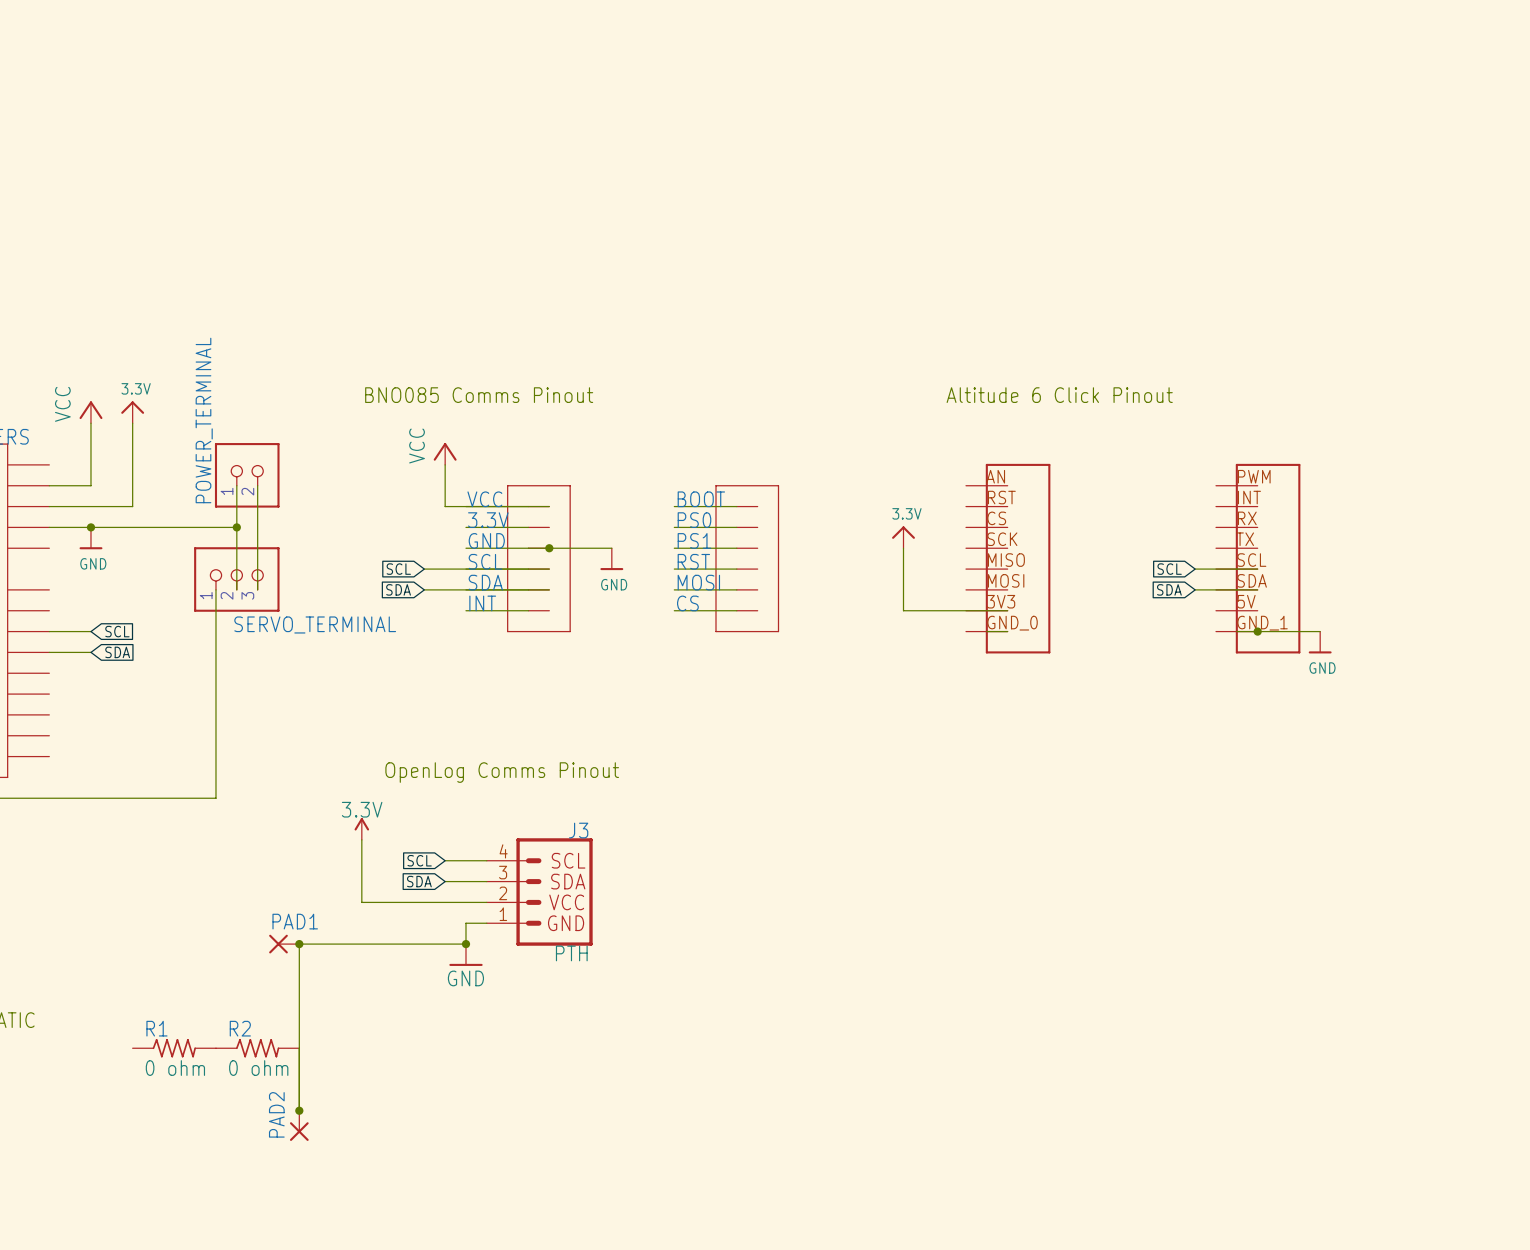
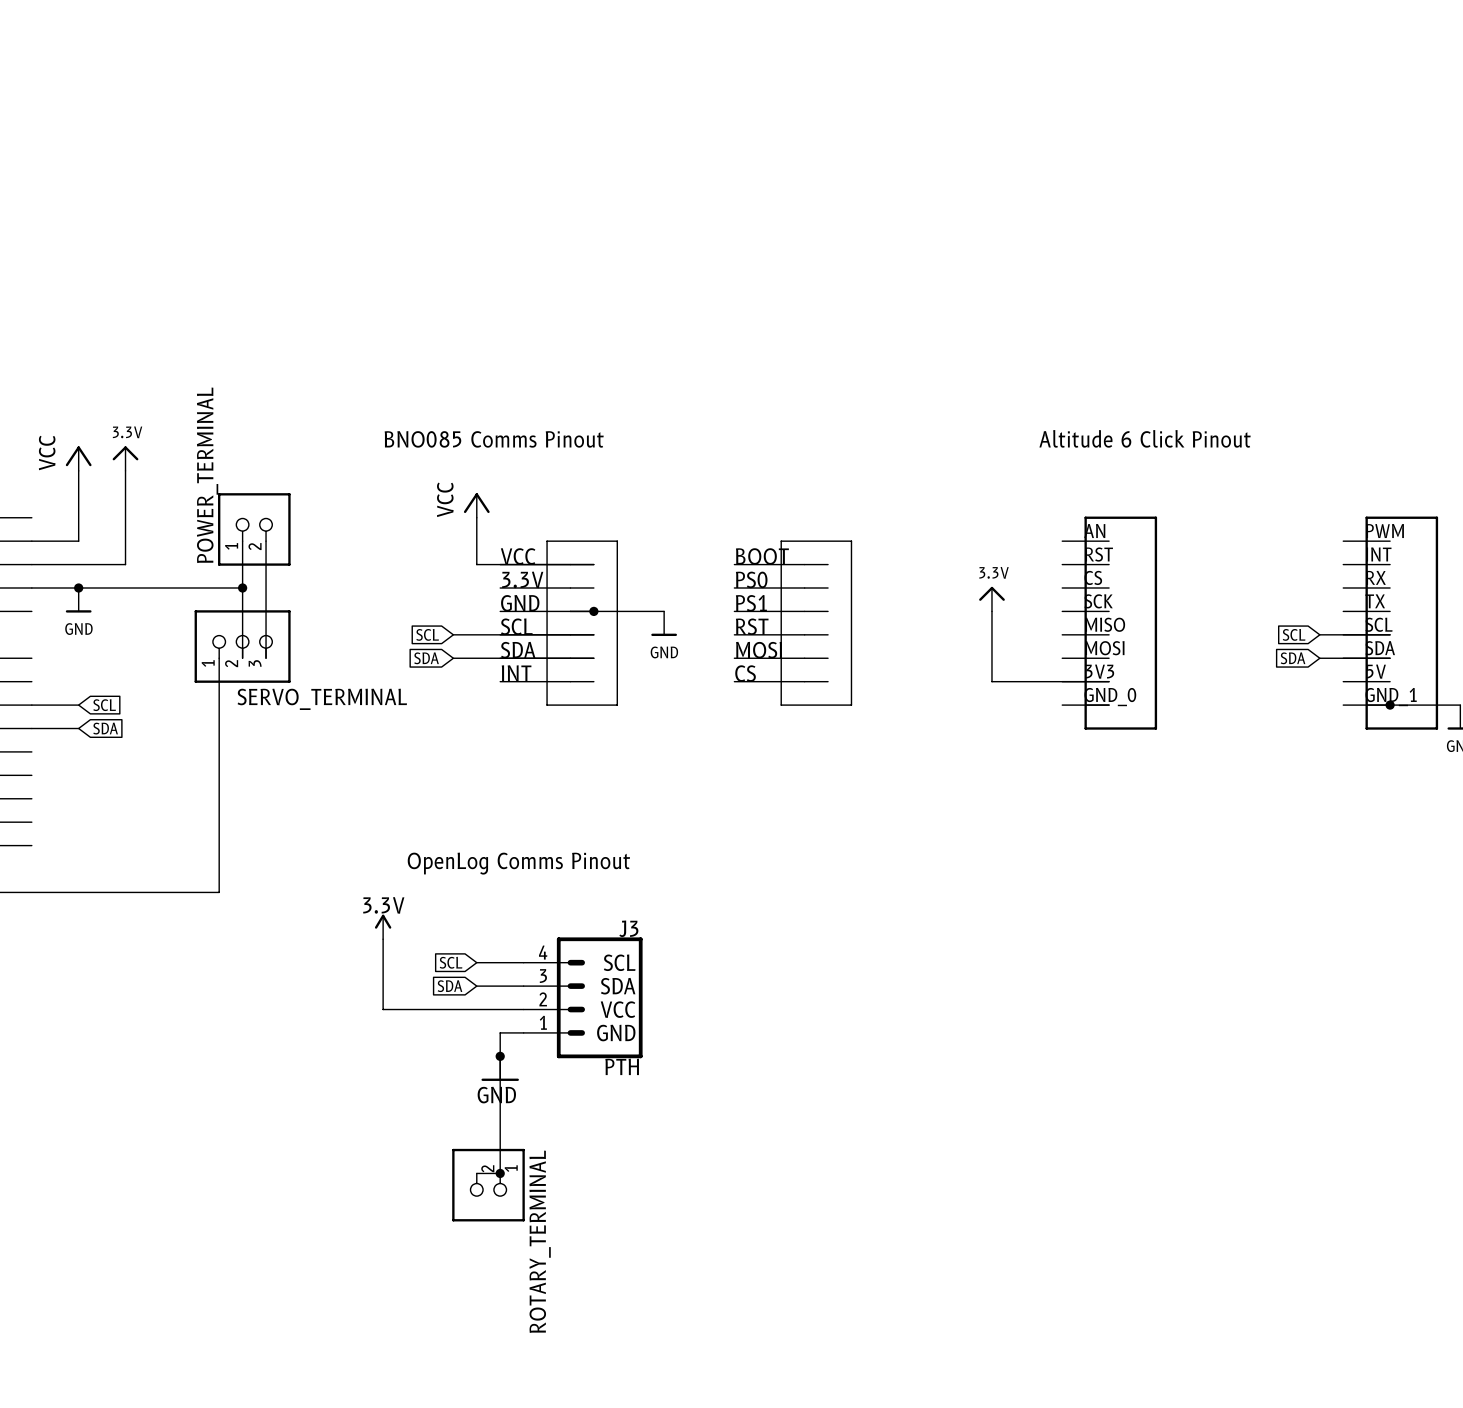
PAD1: (284, 944) -> none
junction: (299, 944) -> none
wire: (465, 944) (299, 944) (299, 1110) -> (500, 1056) (500, 1173) (476, 1173)
R1: 0 ohm (174, 1048) -> none
R2: 0 ohm (257, 1048) -> none
junction: none -> (500, 1173)
ROTARY_TERMINAL: none -> (488, 1185)
junction: (299, 1110) -> none
PAD2: (299, 1125) -> none

